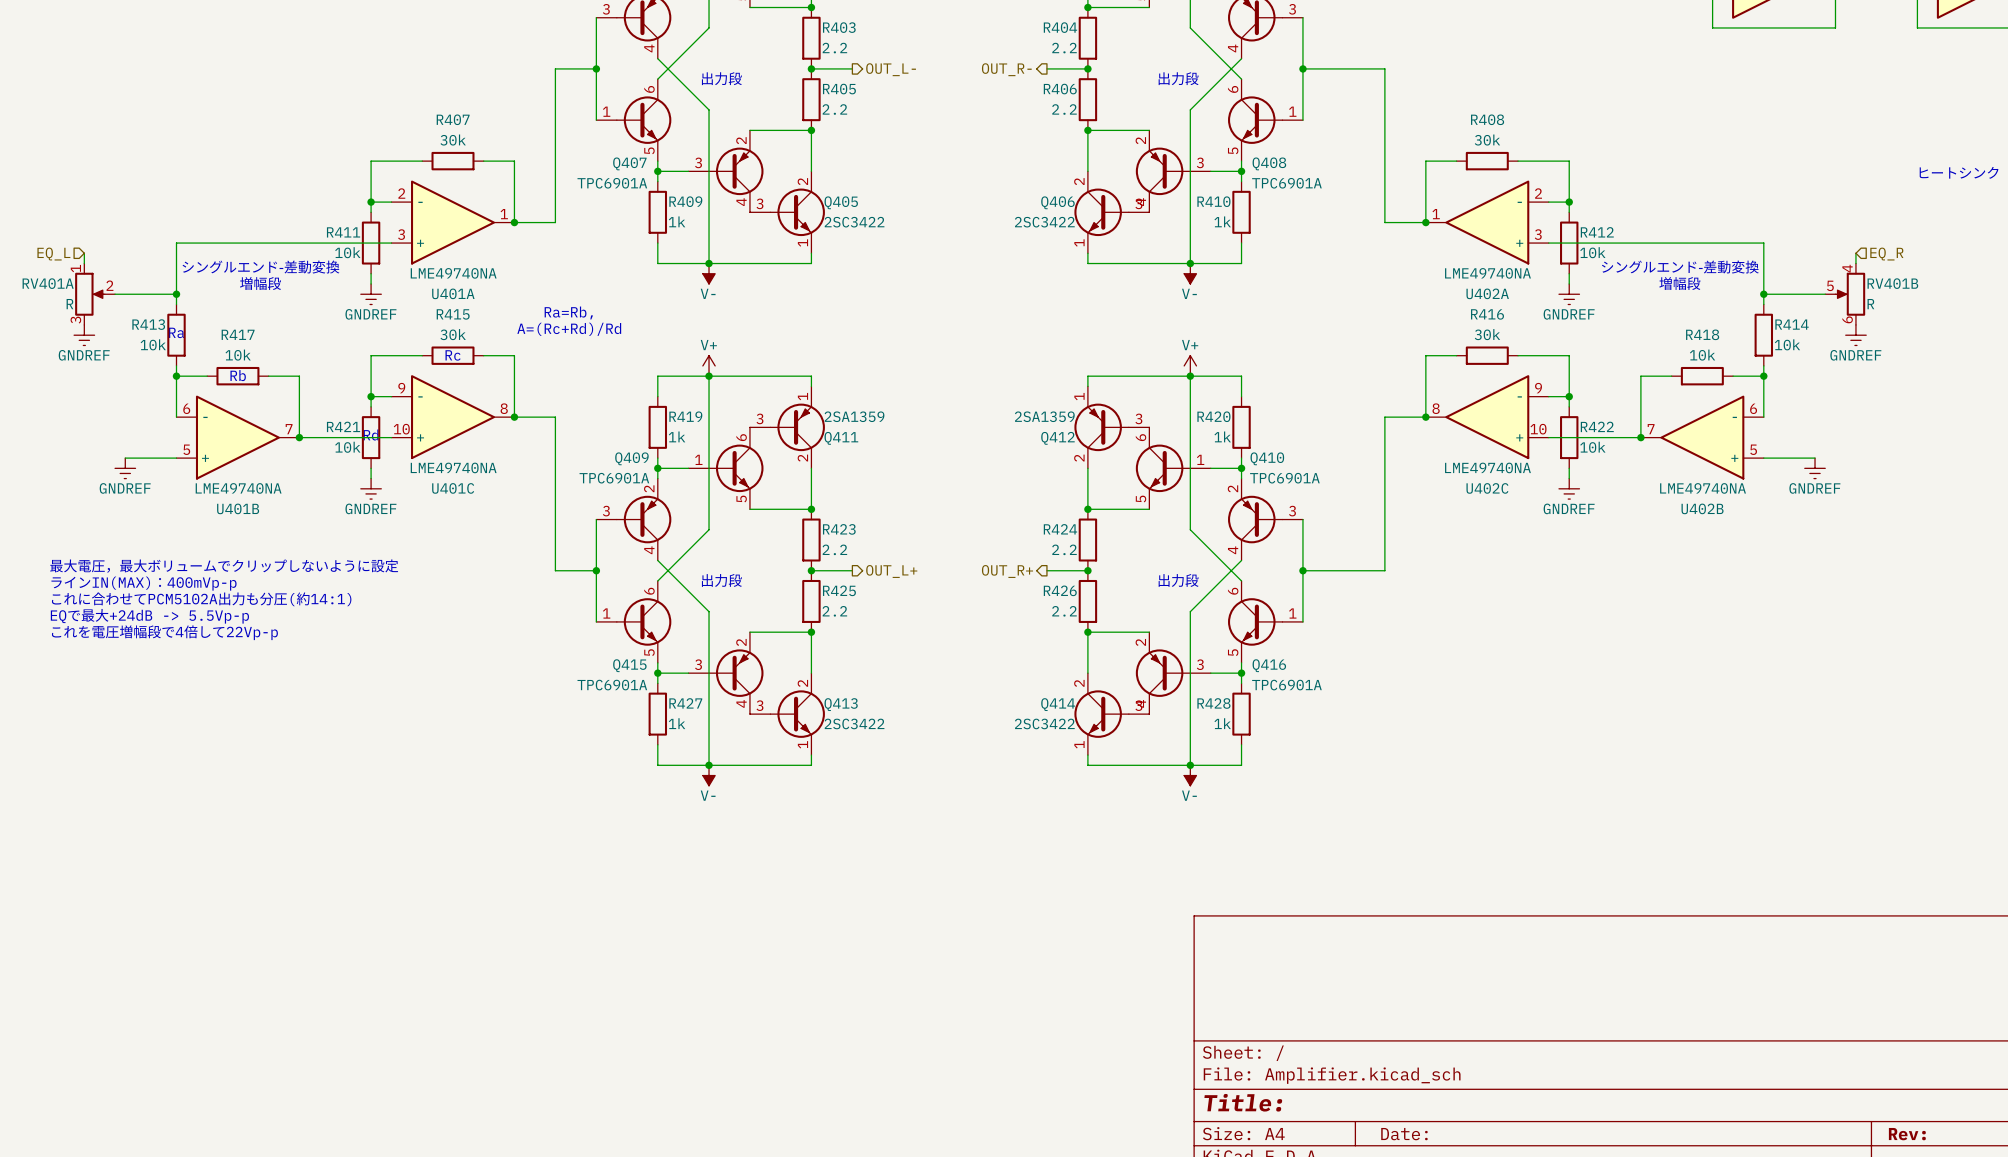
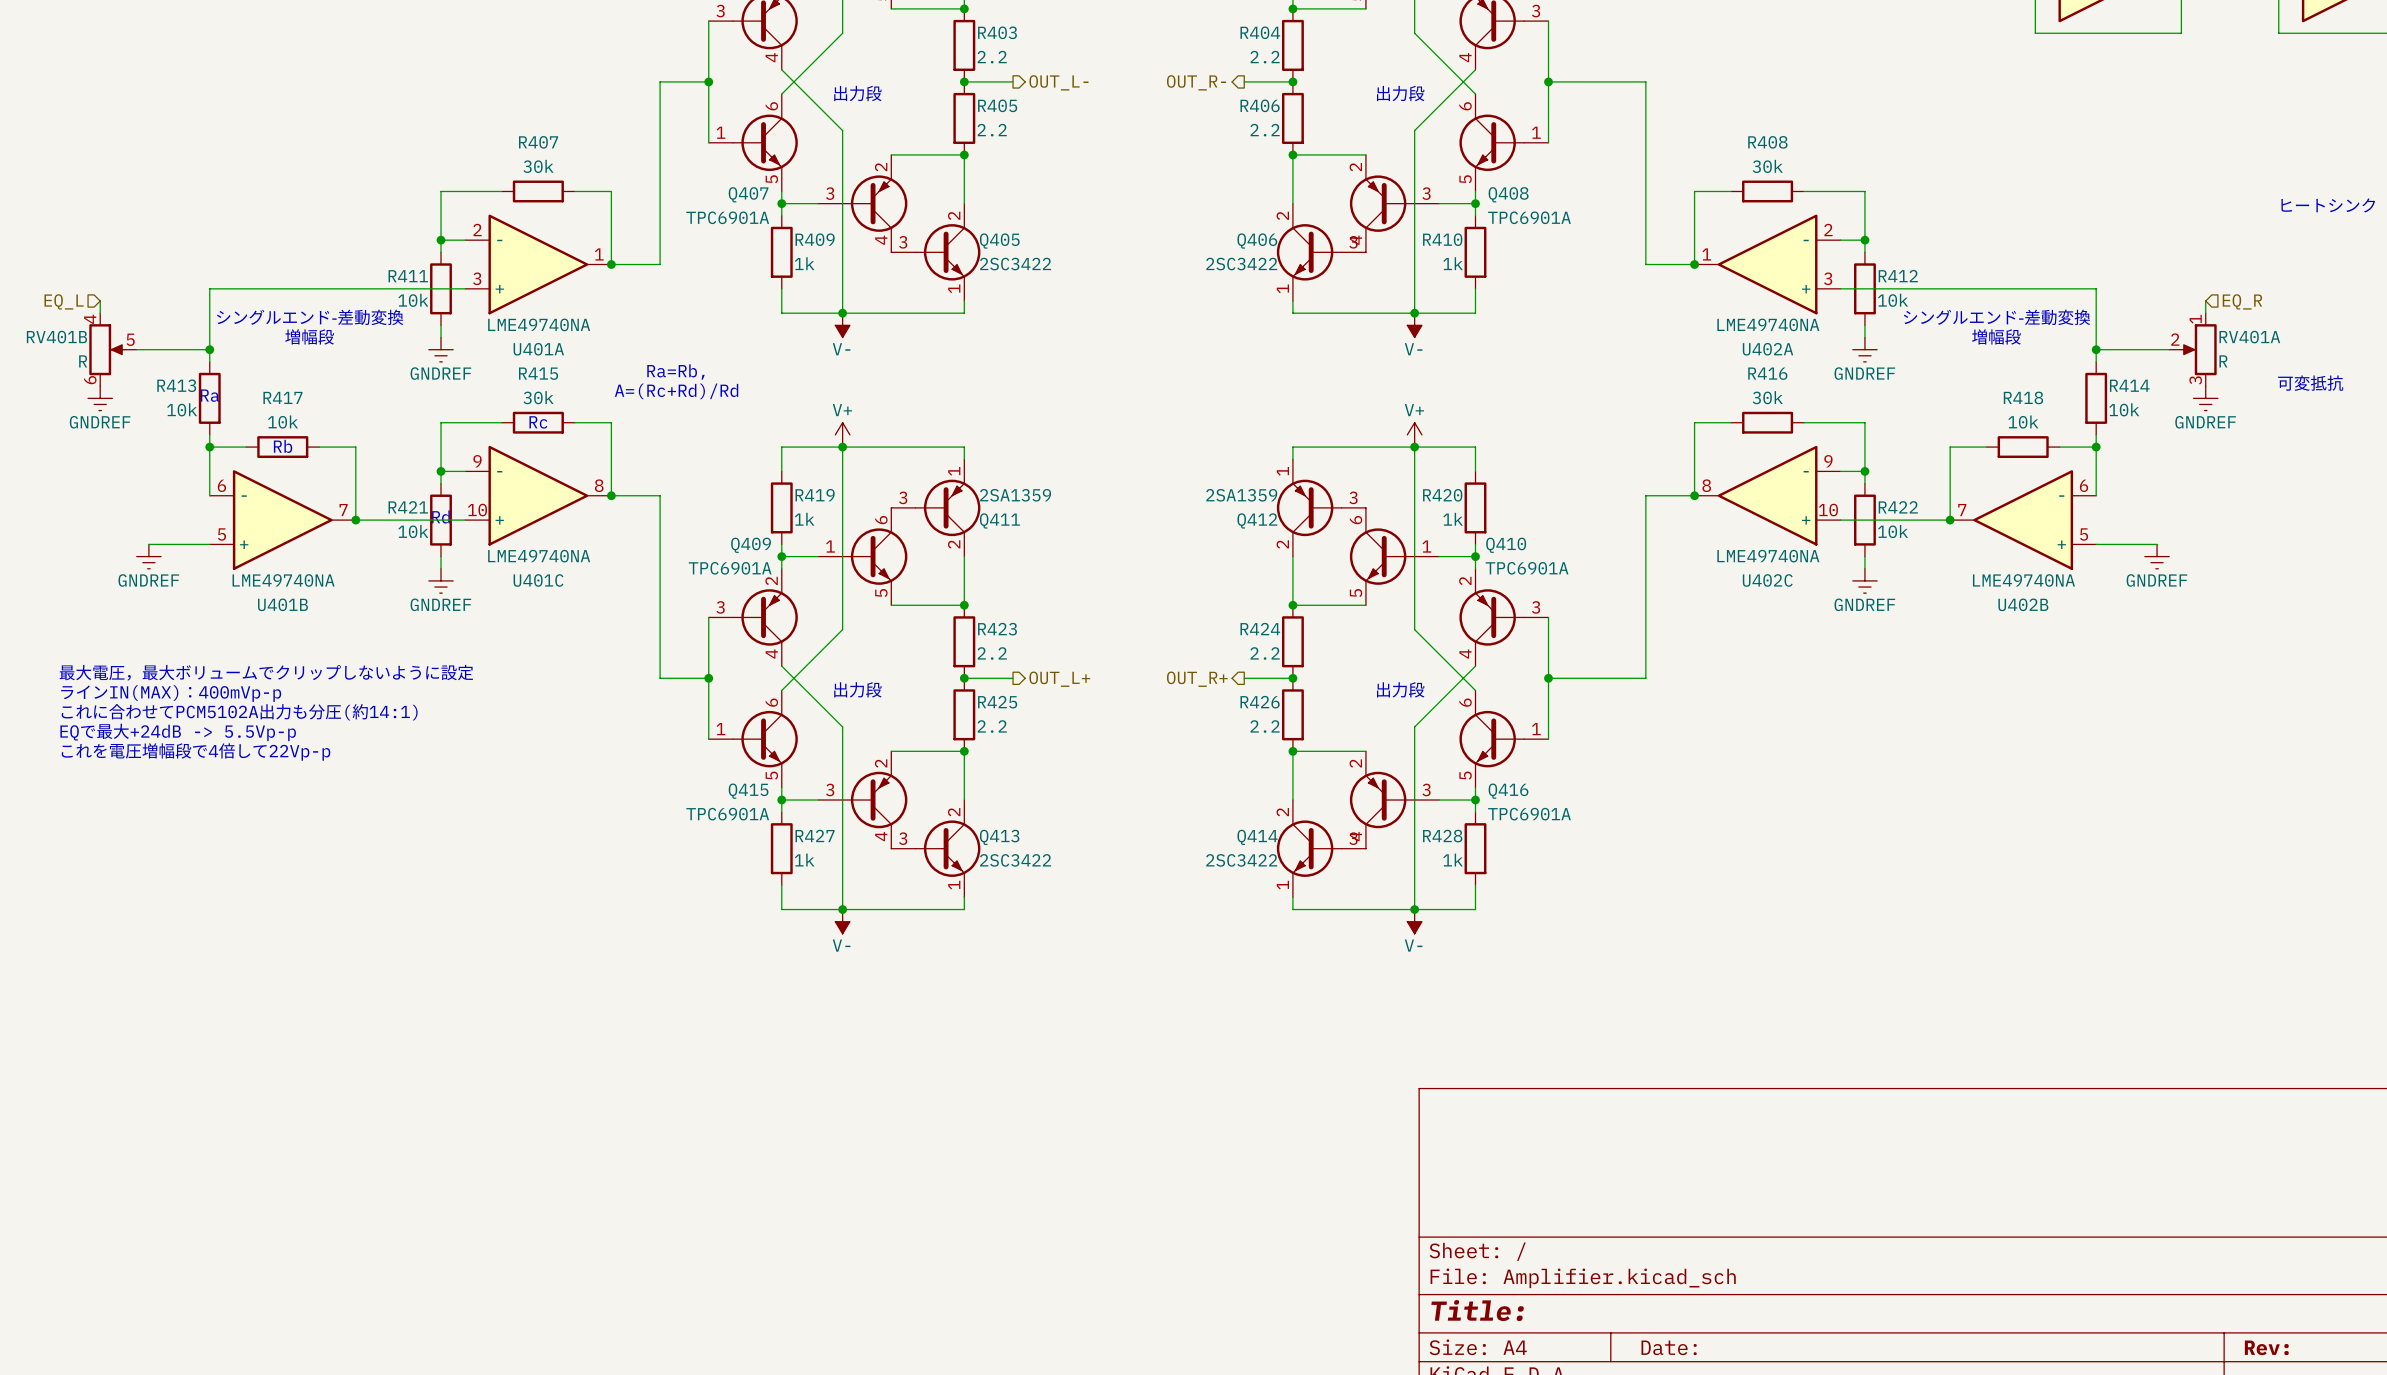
RV401A flip: as is (89, 294) -> left-right (2199, 349)
RV401A position: (95, 294) -> (2192, 349)
RV401B position: (1845, 294) -> (113, 349)
RV401B flip: as is (1850, 294) -> left-right (106, 349)
text: none -> 可変抵抗 (2310, 383)

